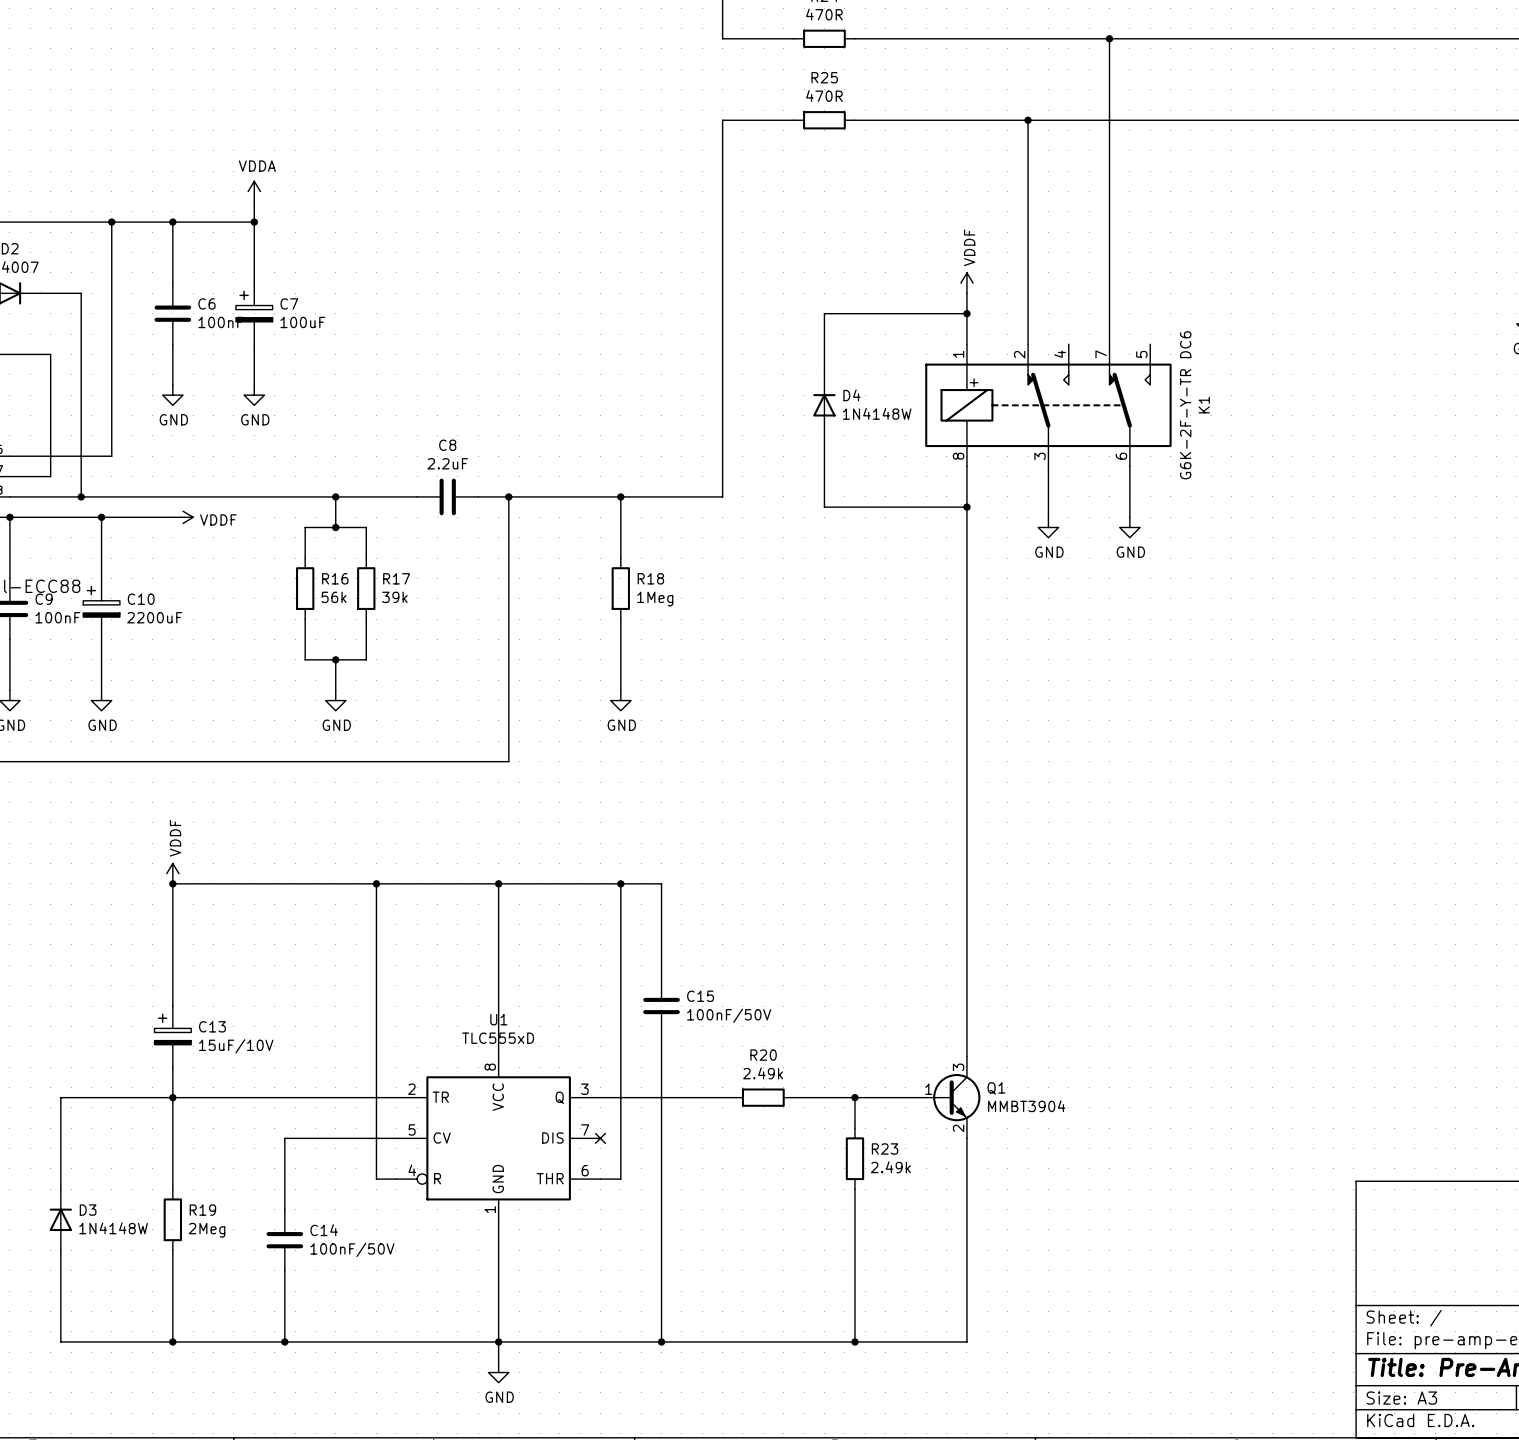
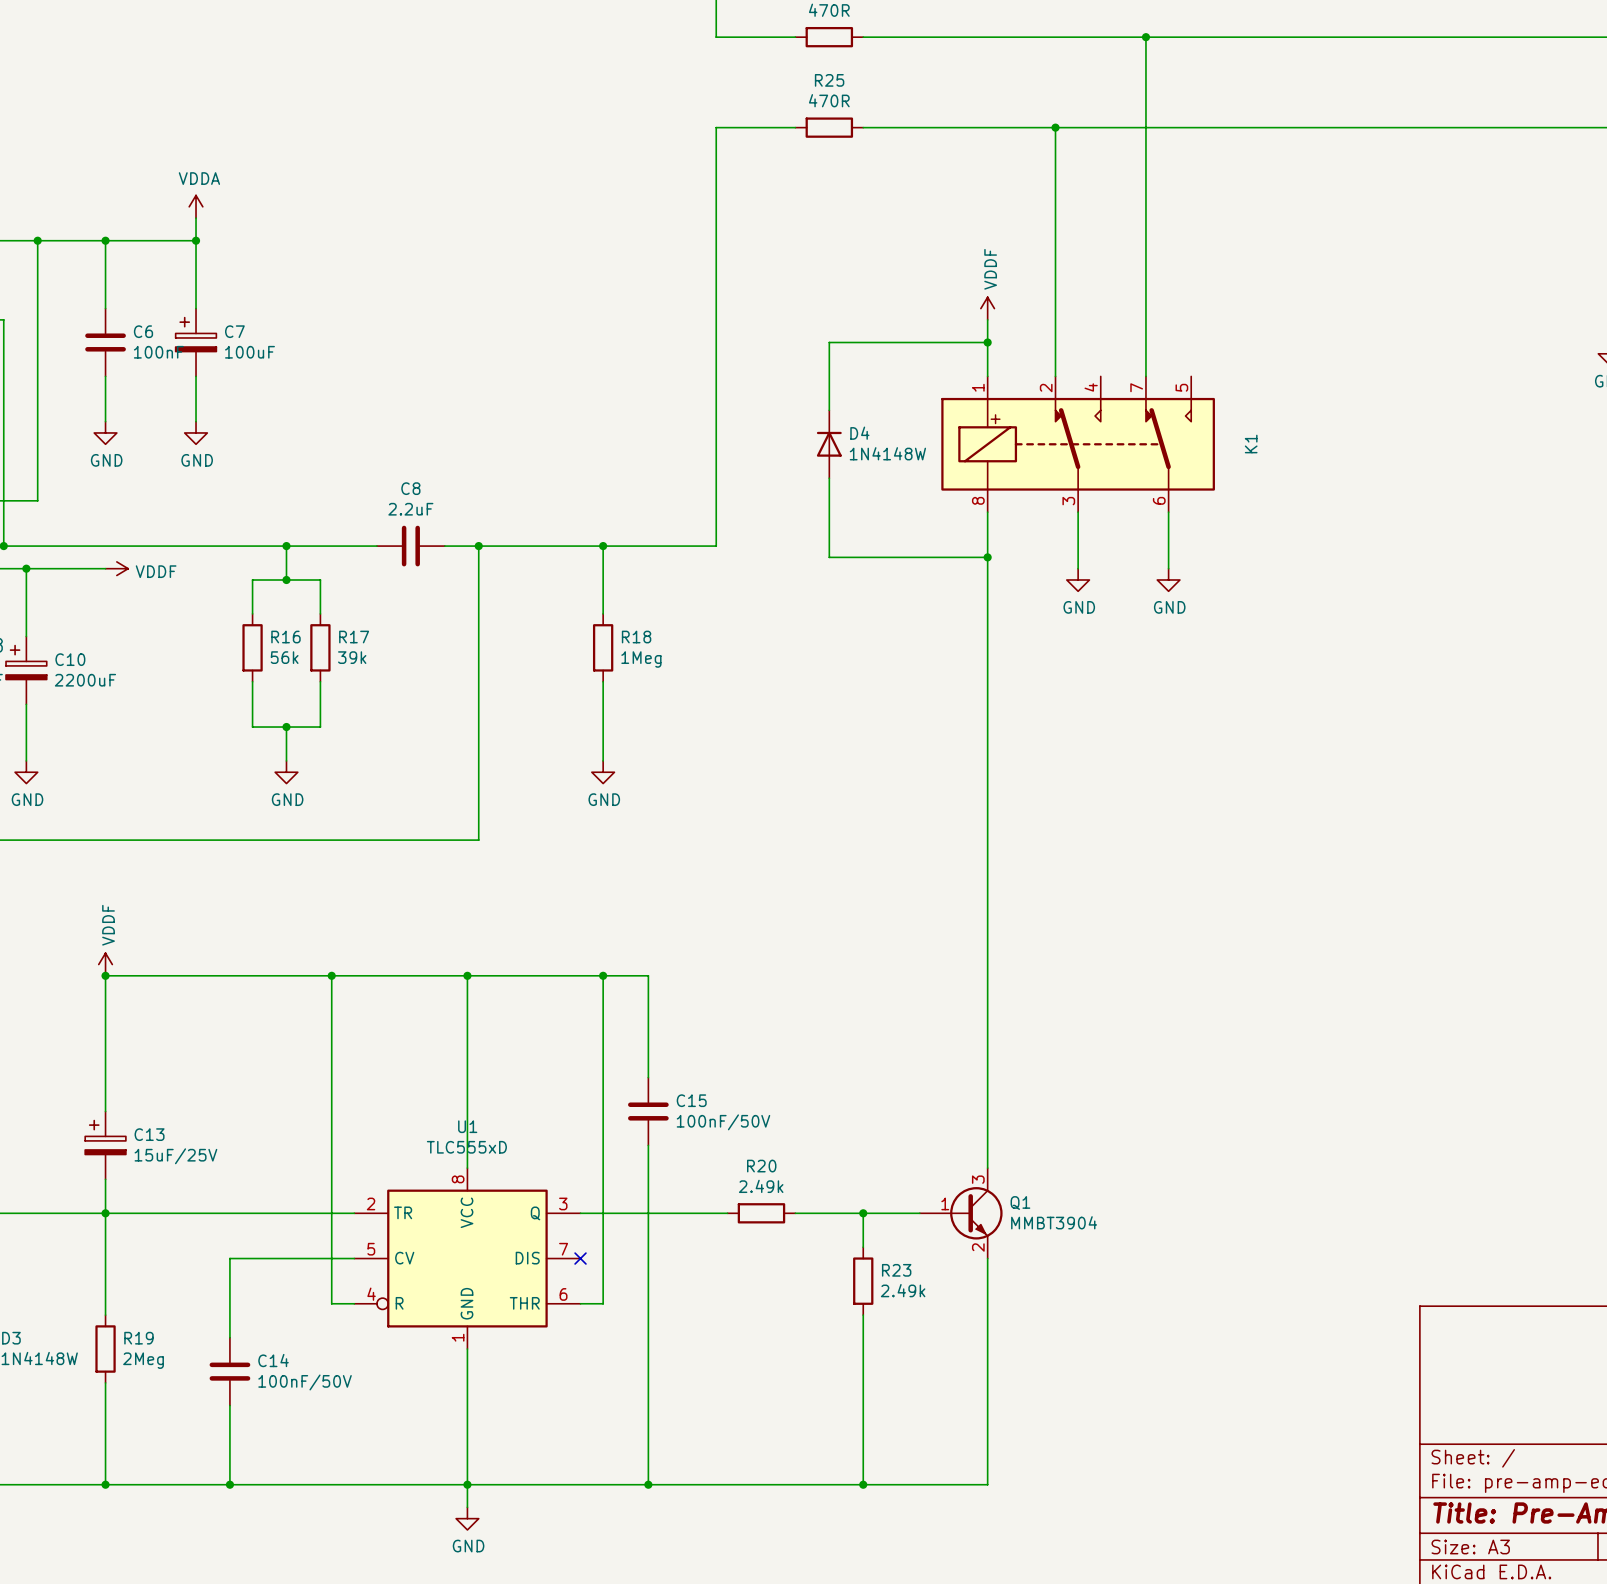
K1 value: G6K-2F-Y-TR DC6 (1185, 405) -> none
C13 value: 15uF/10V (236, 1046) -> 15uF/25V (175, 1156)

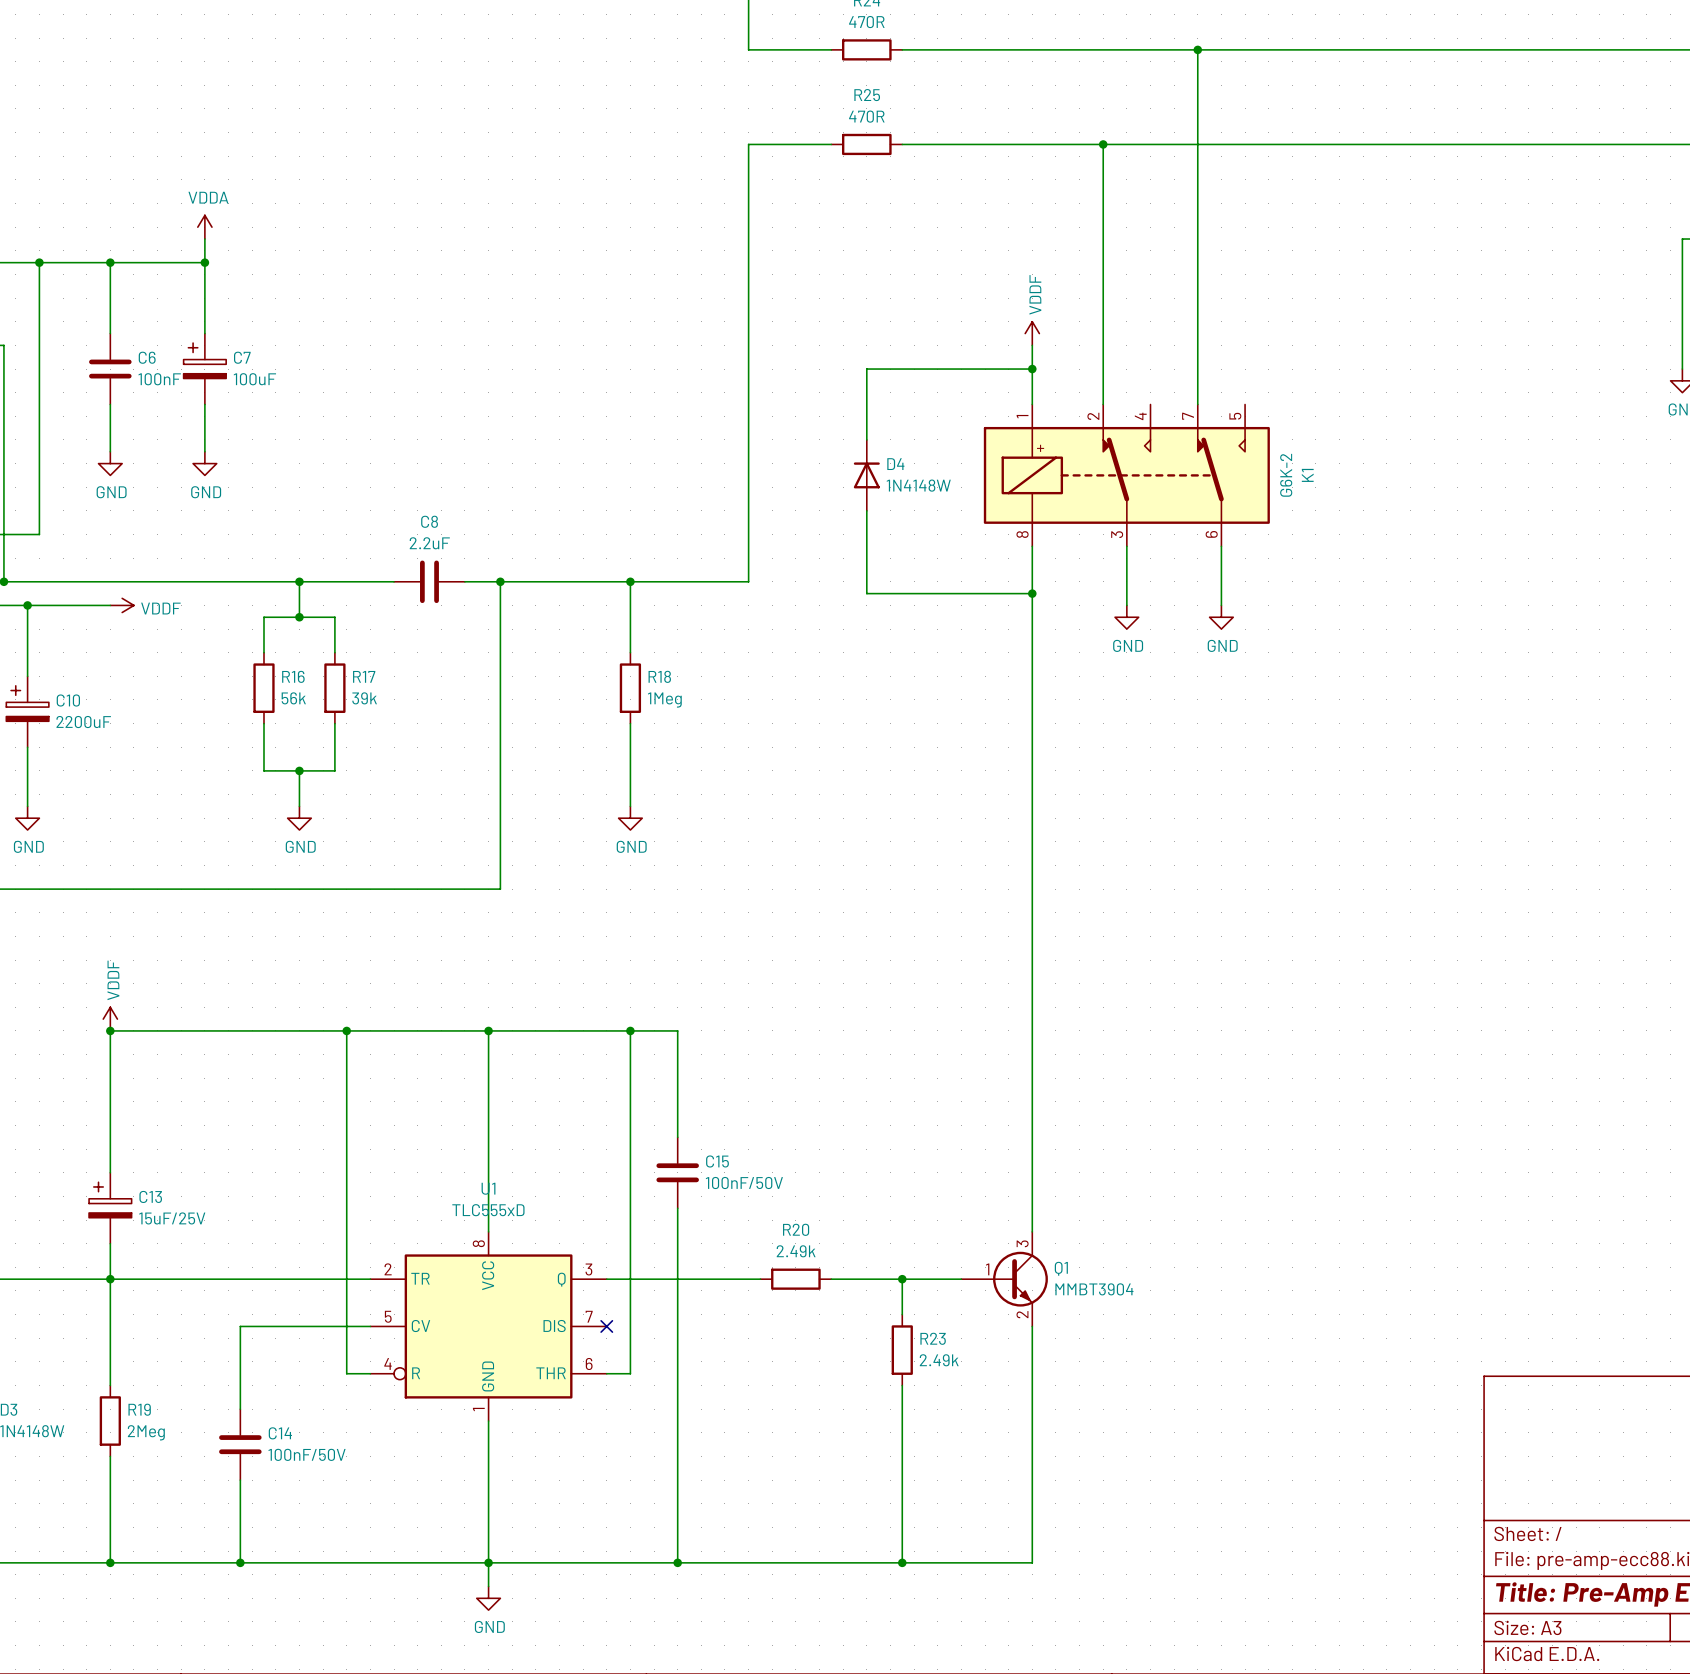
K1 value: none -> G6K-2 (1286, 475)

